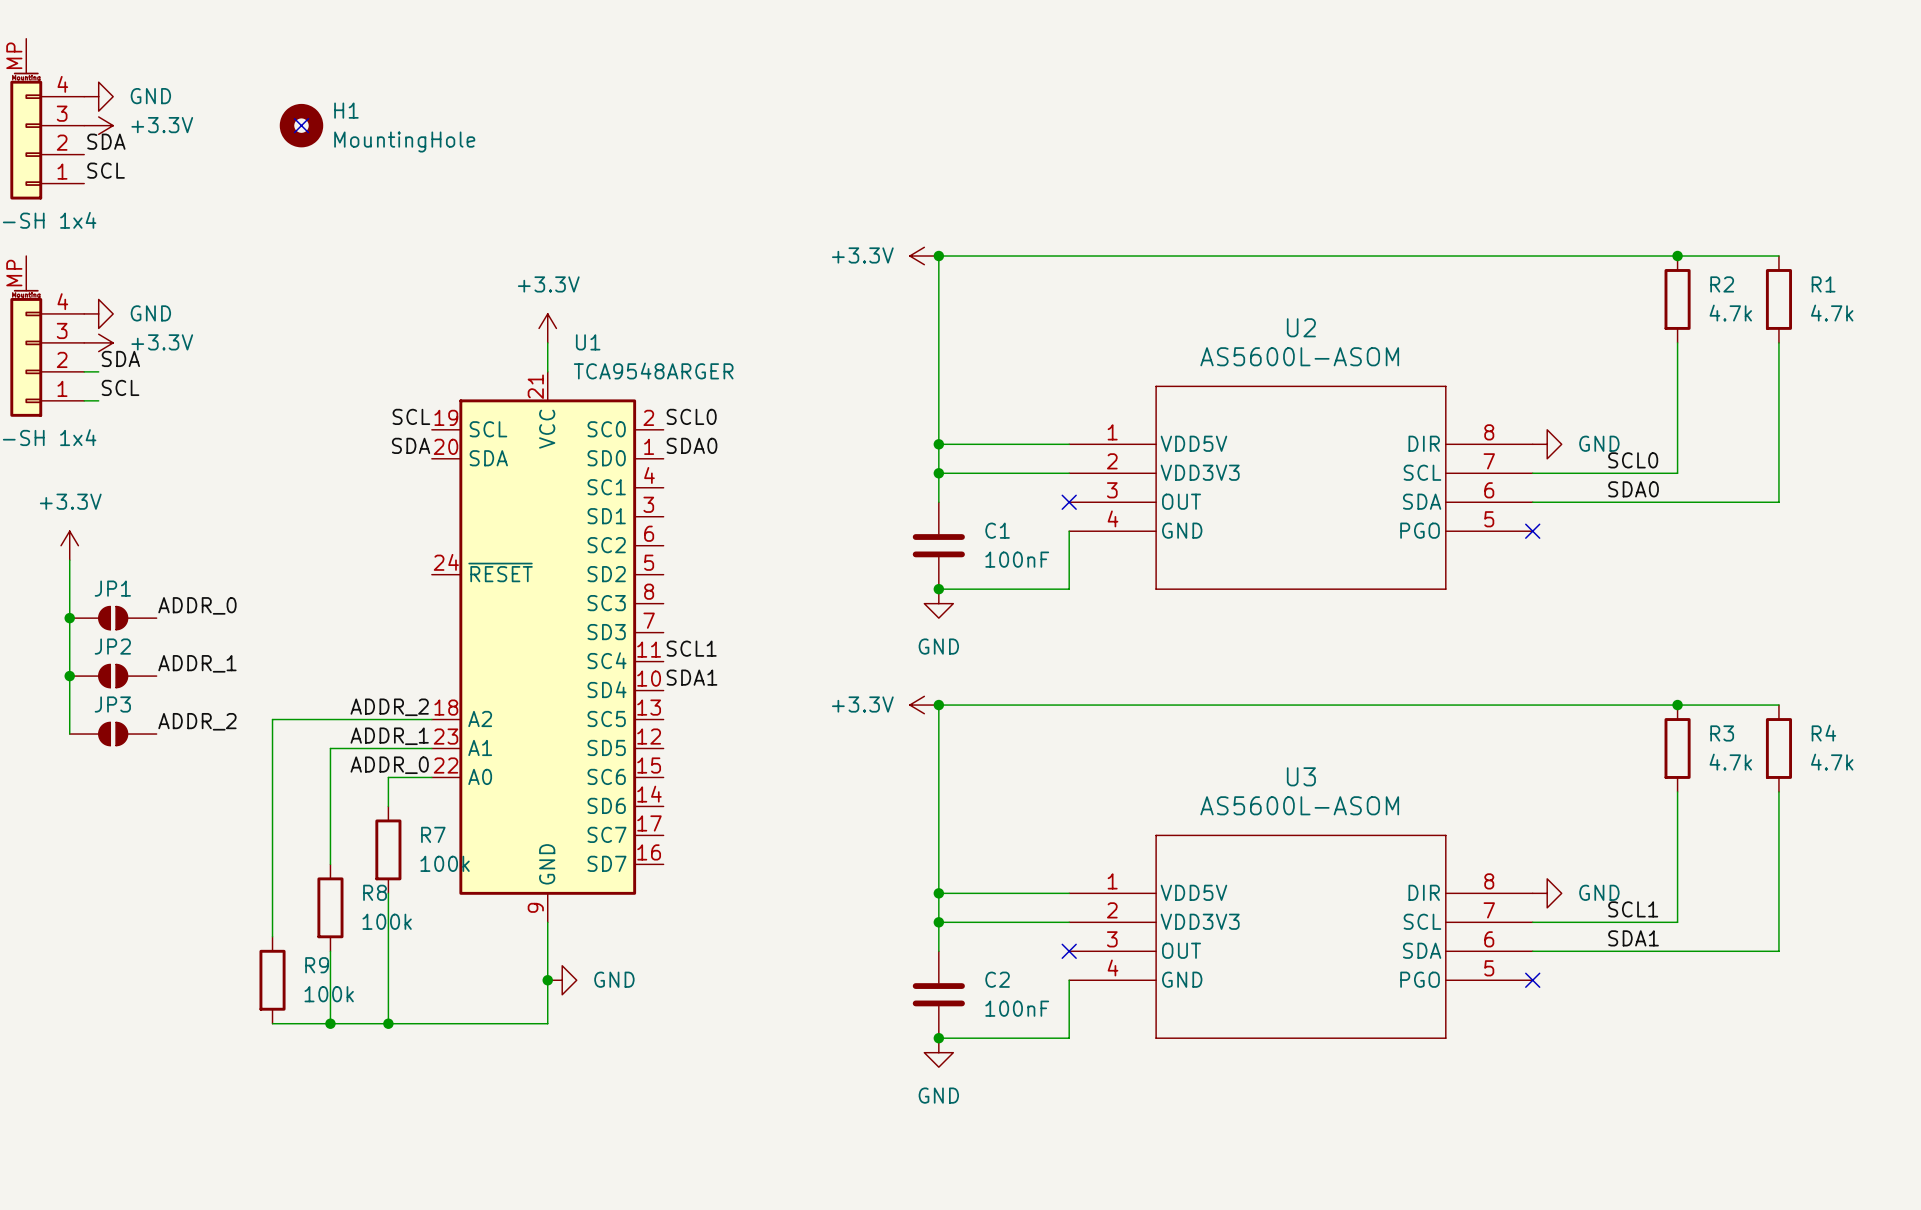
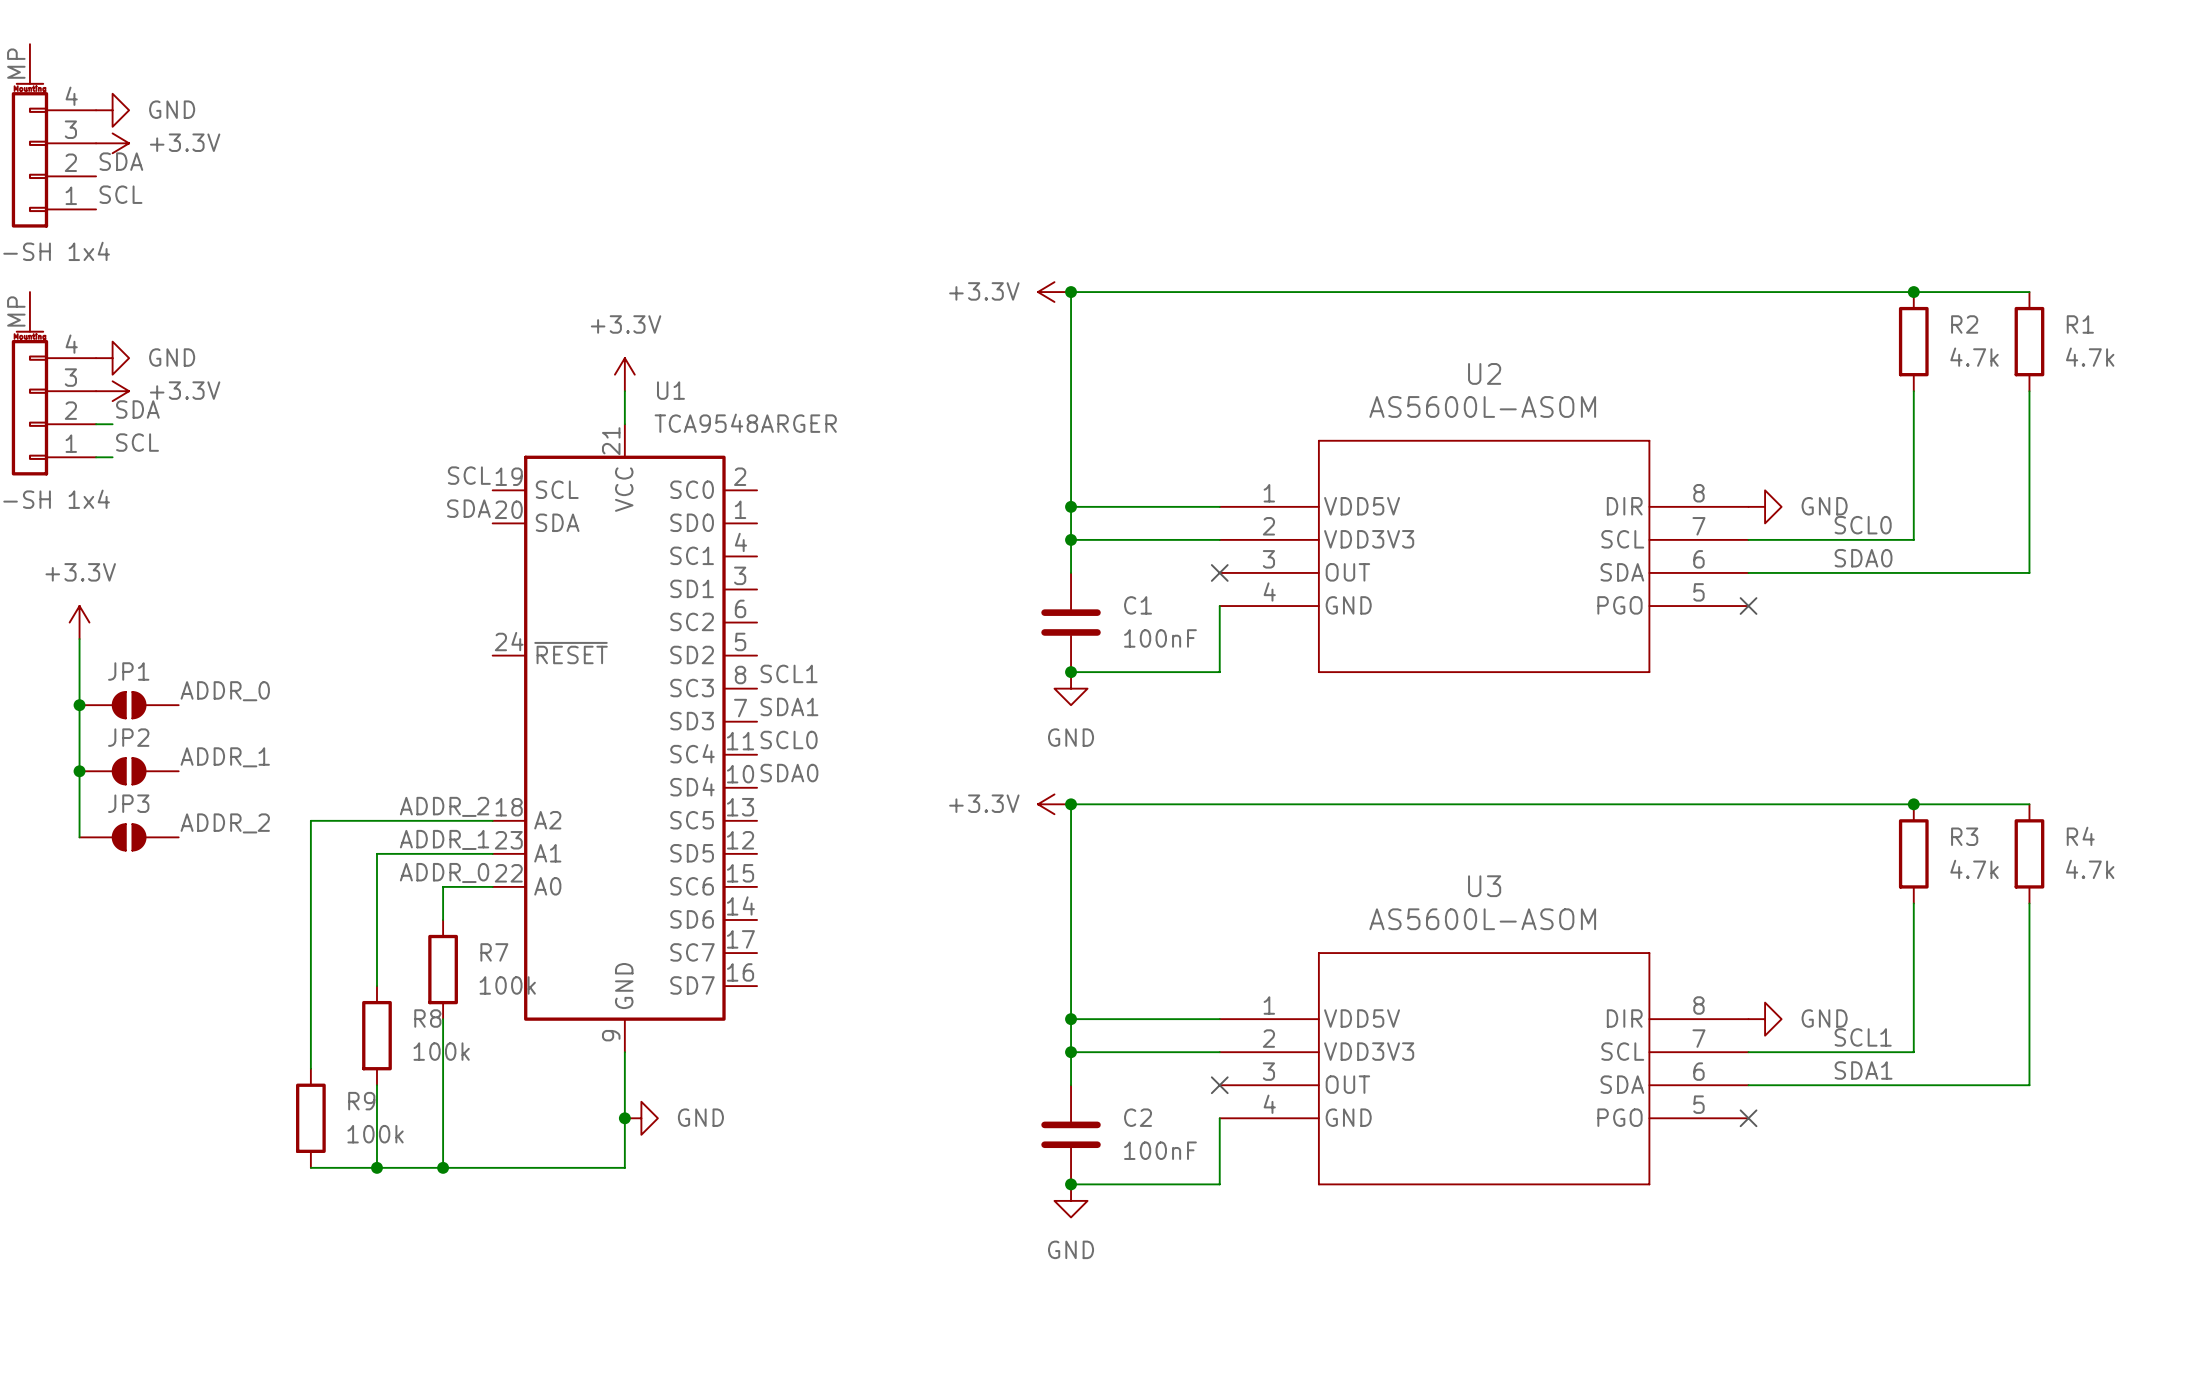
no-connect mark: (301, 125) -> none
H1: MountingHole (301, 125) -> none
label: SCL0 (691, 416) -> none
label: SDA0 (692, 445) -> none
label: none -> SCL1 (789, 673)
label: none -> SDA1 (789, 706)
label: SCL1 (691, 648) -> SCL0 (789, 739)
label: SDA1 (692, 677) -> SDA0 (789, 773)

